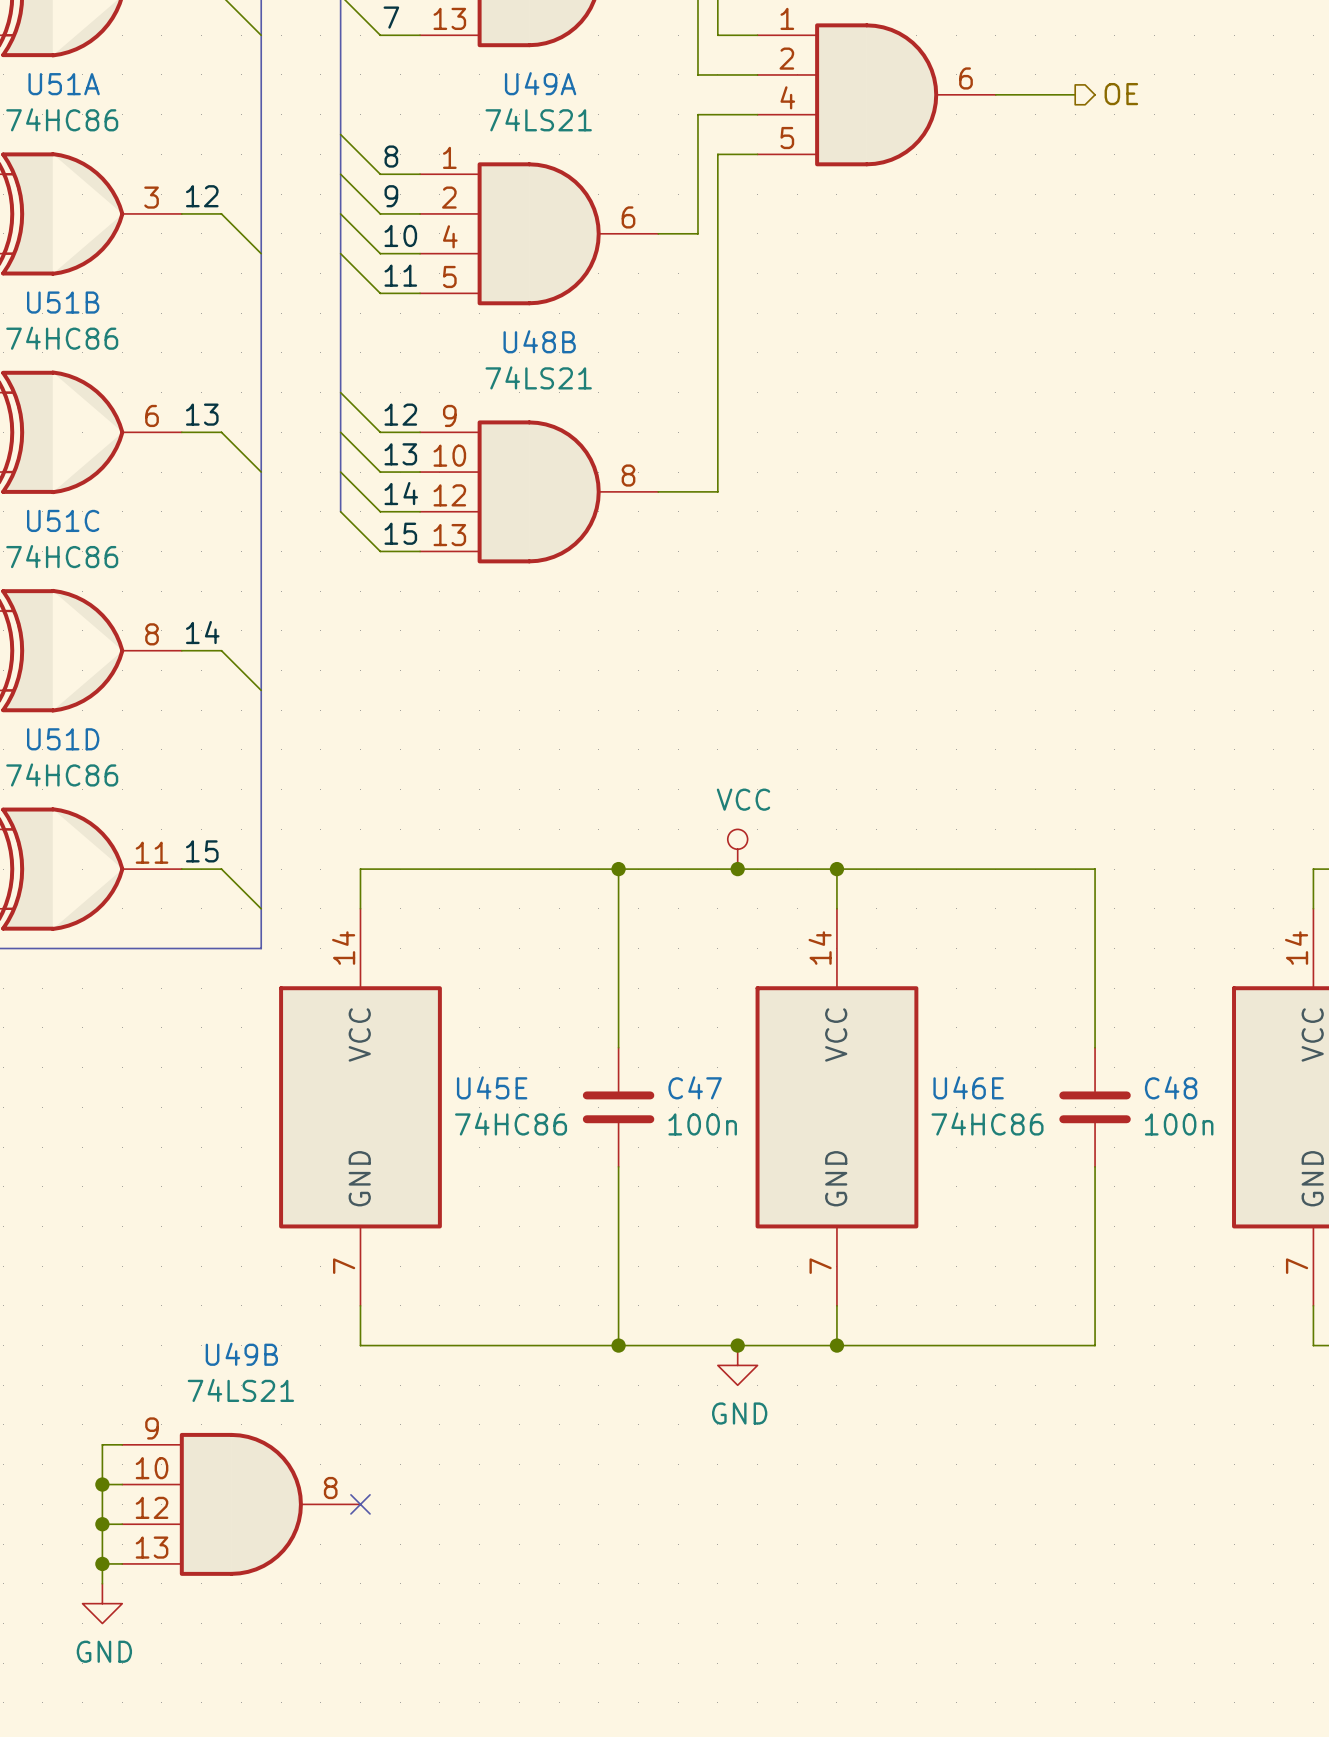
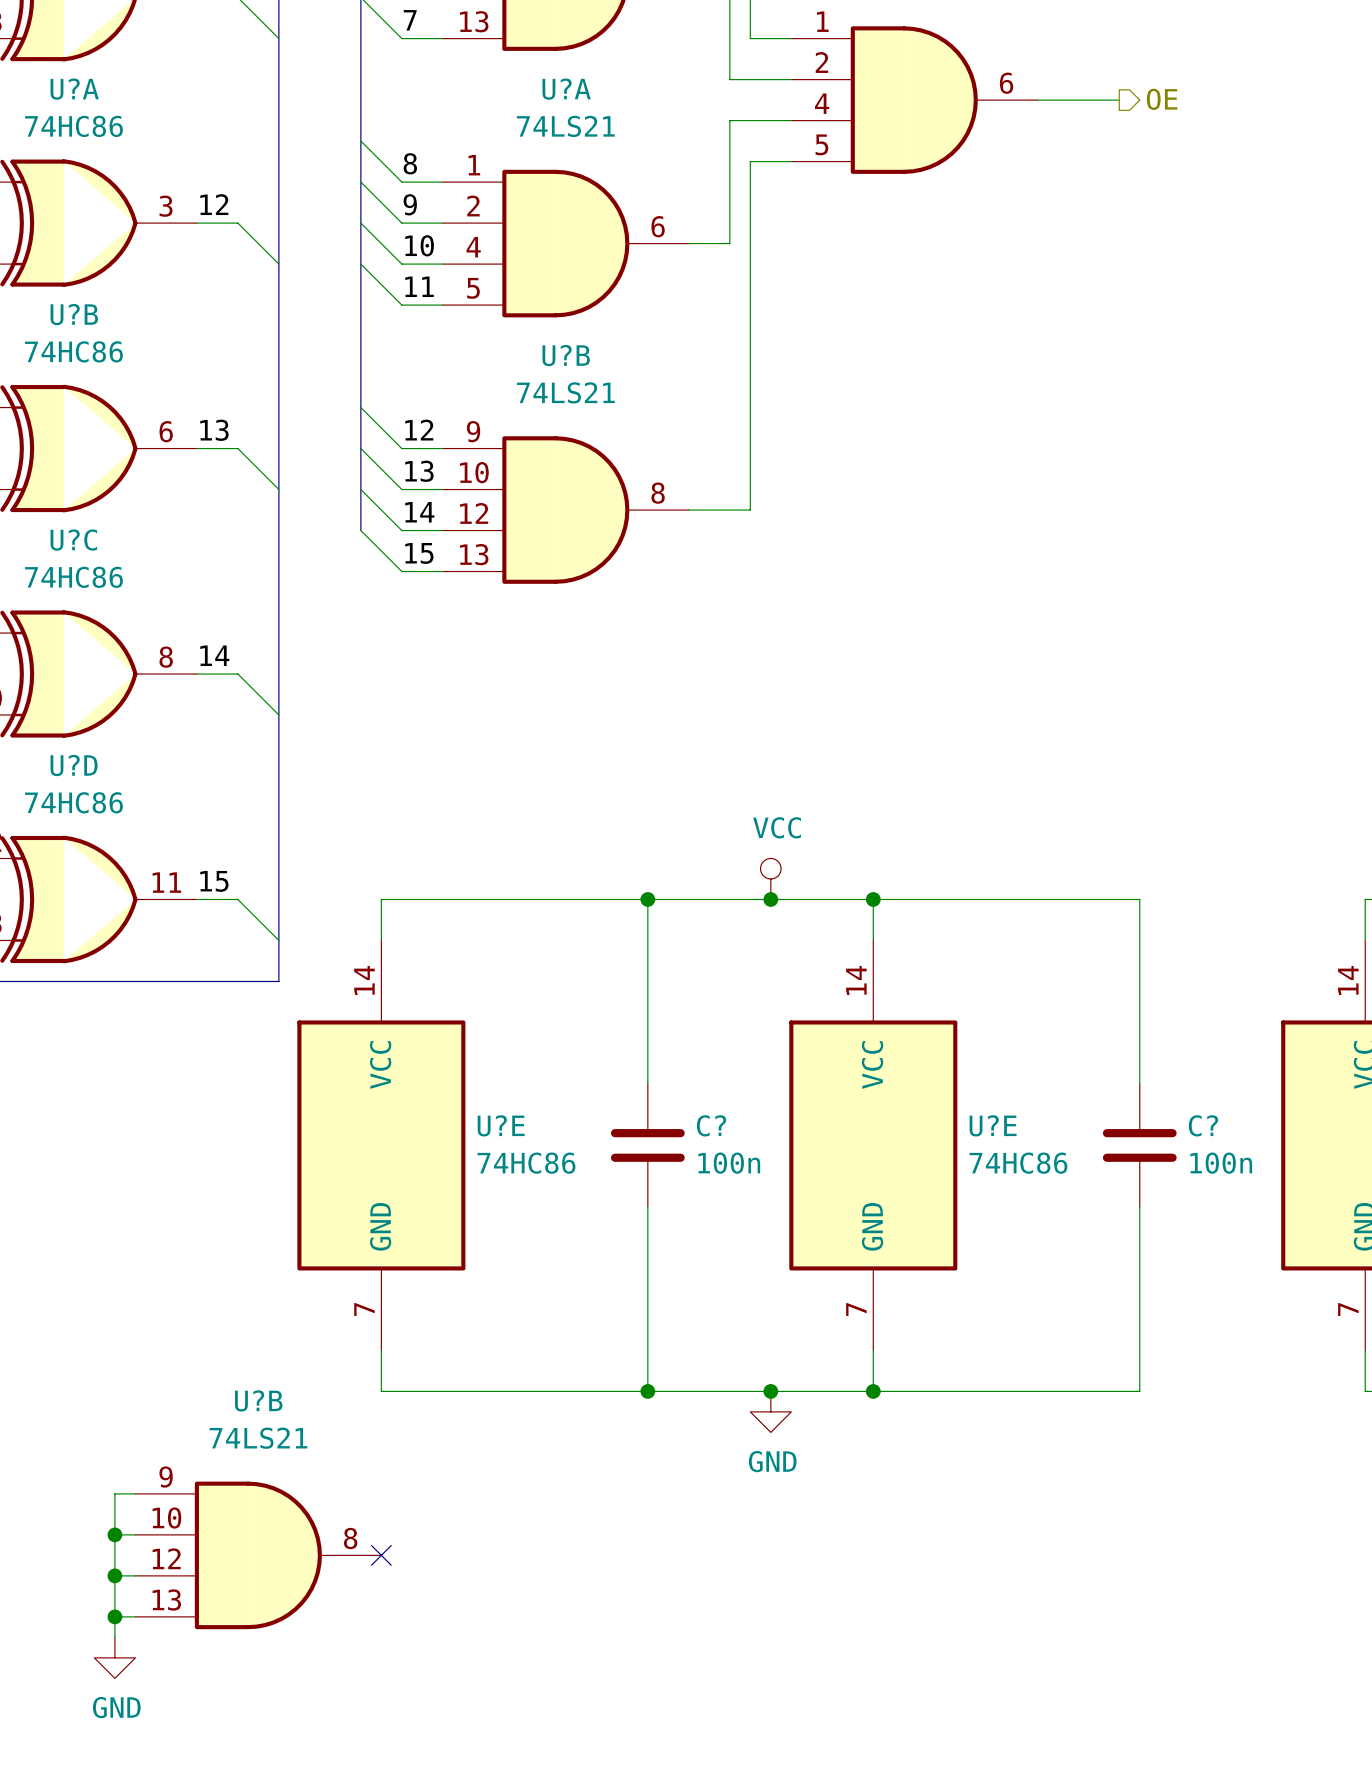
U49A name: U49A (540, 83) -> U?A (566, 89)
U51A name: U51A (64, 84) -> U?A (74, 89)
U51B name: U51B (63, 302) -> U?B (74, 314)
U48B name: U48B (539, 341) -> U?B (566, 355)
U51C name: U51C (63, 520) -> U?C (73, 540)
U51D name: U51D (63, 739) -> U?D (74, 765)
U45E name: U45E (492, 1087) -> U?E (501, 1125)
C47 name: C47 (695, 1087) -> C? (711, 1125)
U46E name: U46E (968, 1087) -> U?E (993, 1125)
C48 name: C48 (1171, 1087) -> C? (1203, 1125)
U49B name: U49B (241, 1354) -> U?B (258, 1400)

